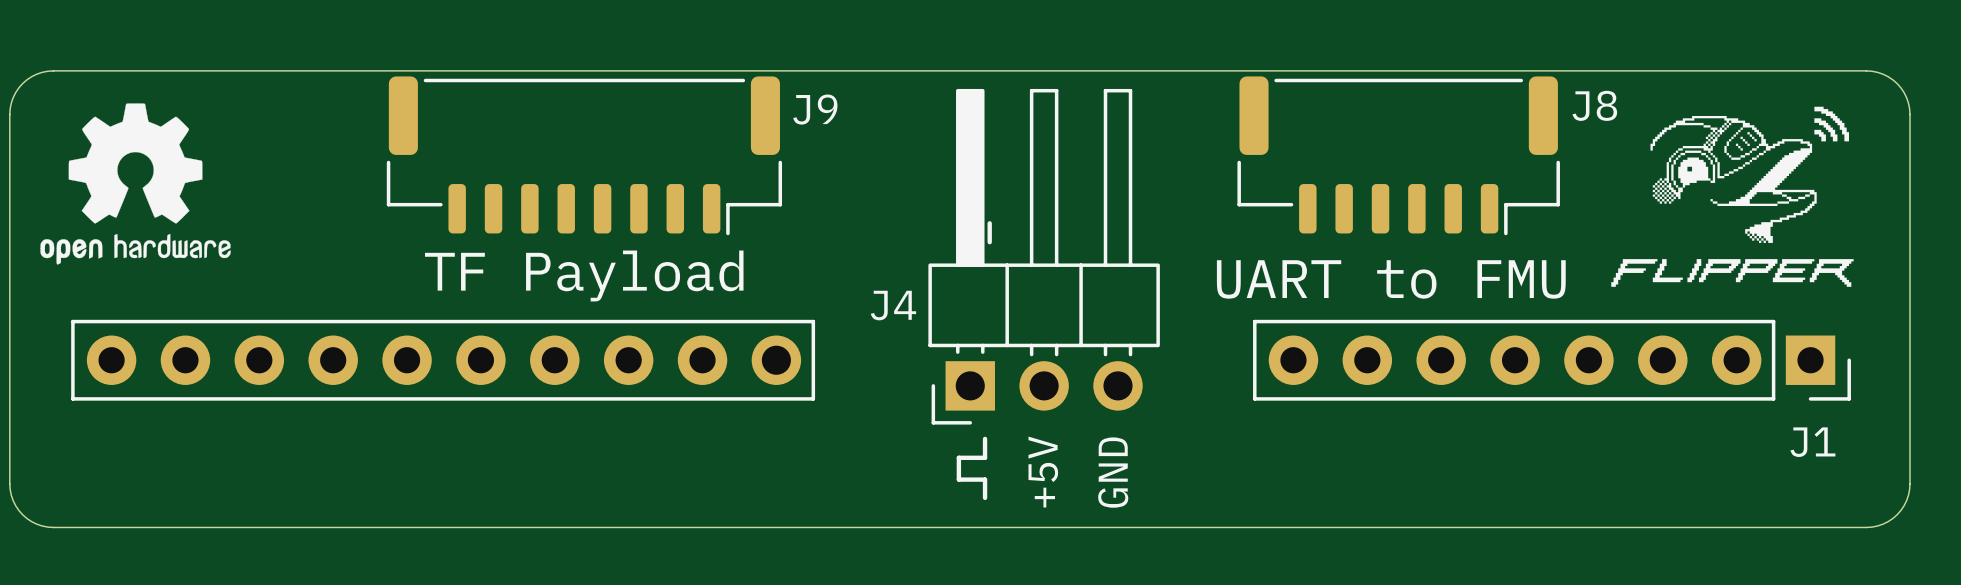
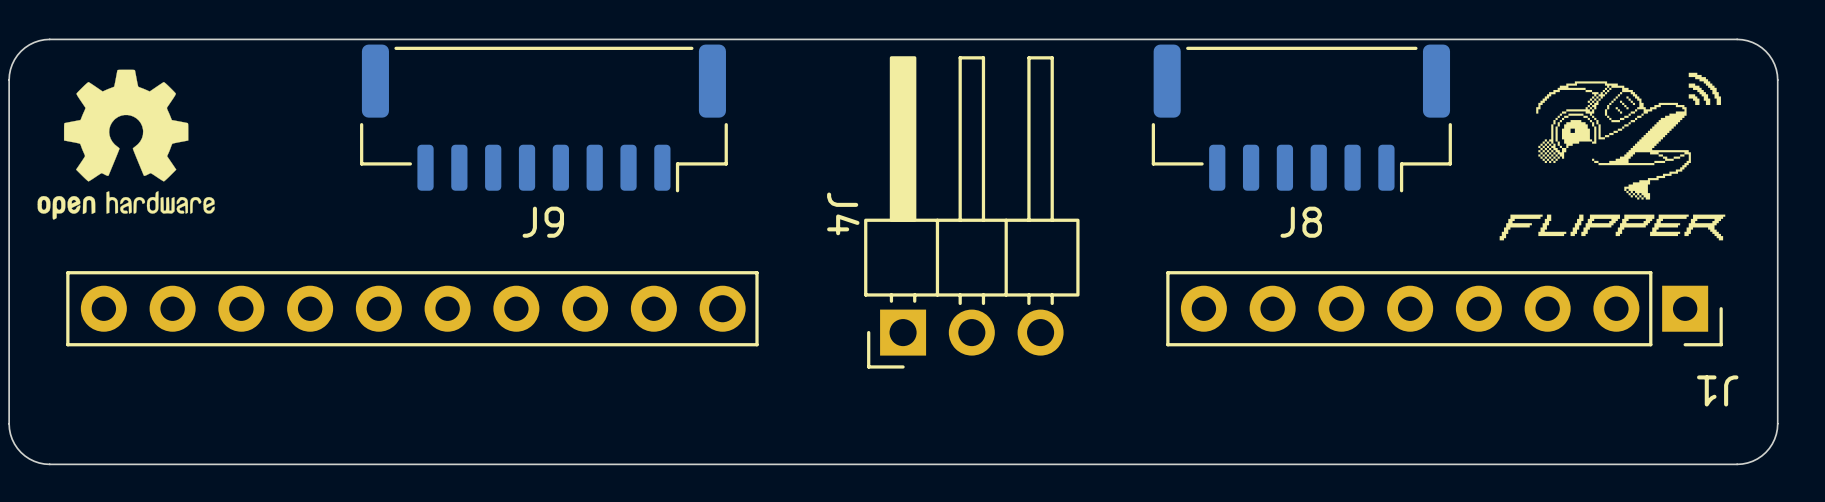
J8 name position: J8 (1594, 105) -> J8 (1301, 222)
J9 name position: J9 (815, 109) -> J9 (543, 222)
line: (989, 223) (989, 242) -> none
text: TF Payload (584, 276) -> none
text: UART to FMU (1391, 279) -> none
J4 name rotation: 0° (893, 305) -> 90° clockwise (843, 213)
line: (985, 438) (985, 457) (958, 457) (958, 479) (985, 479) (985, 497) -> none
J1 name rotation: 0° (1812, 442) -> 180° (1717, 390)
text: +5V (1043, 472) -> none
text: GND (1113, 472) -> none

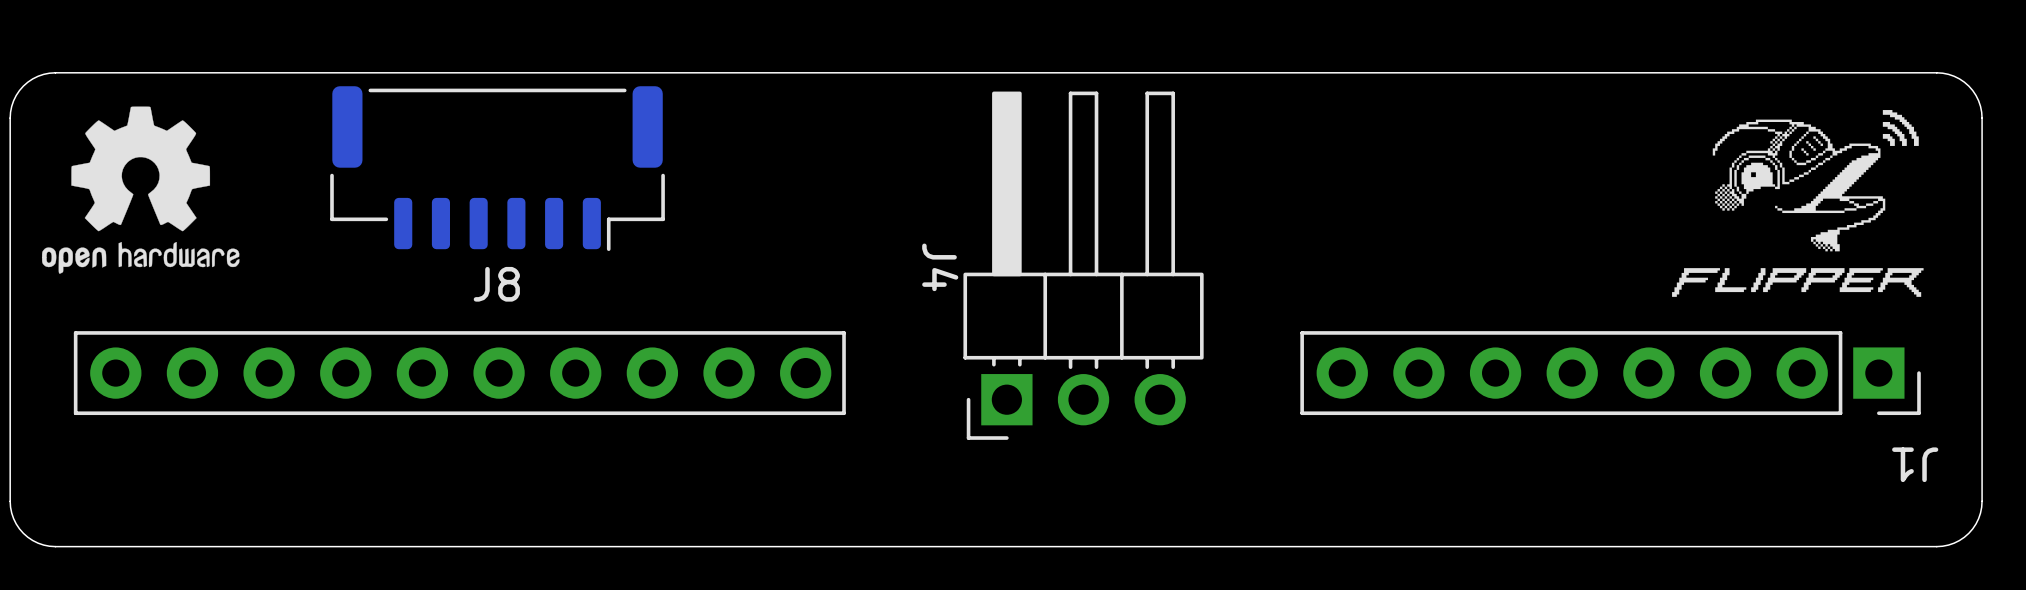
J9: (543, 118) -> none
J8 position: (1301, 118) -> (497, 168)

